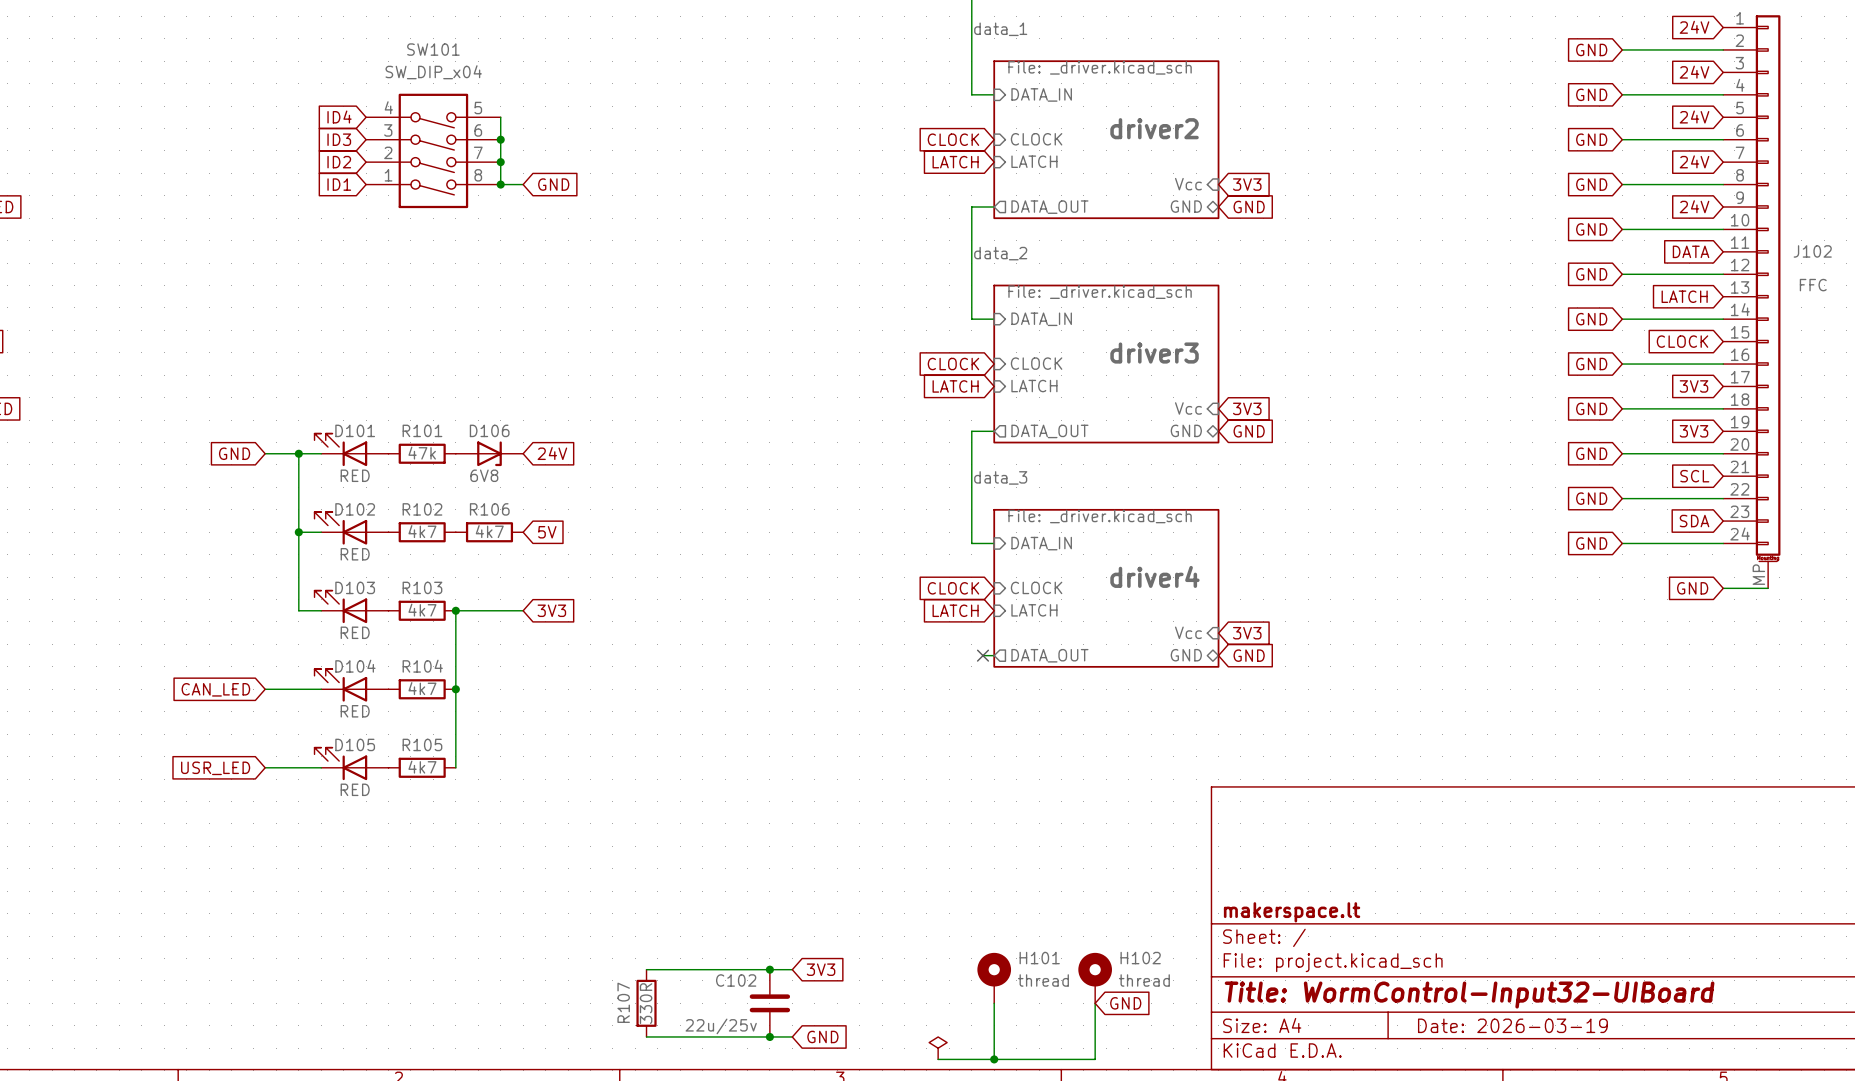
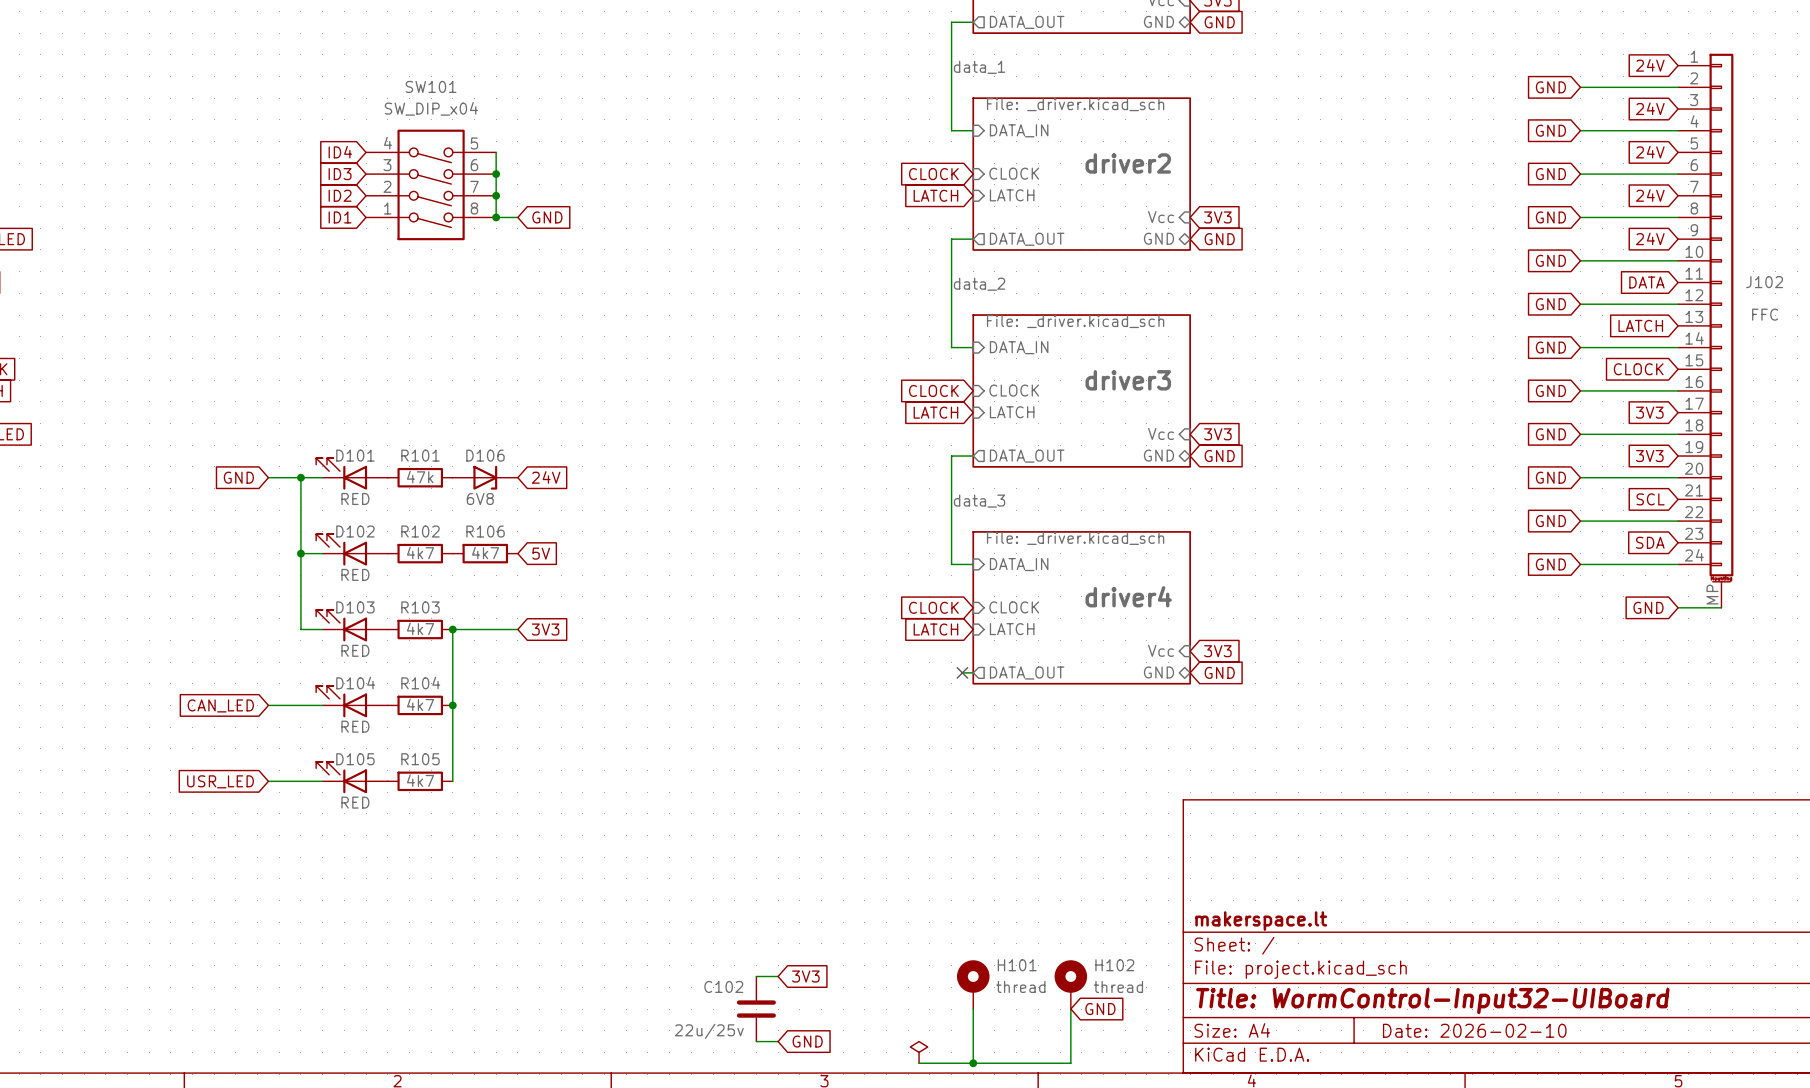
wire: (646, 969) (769, 969) -> none
junction: (769, 969) -> none
R107: 330R (646, 1003) -> none
title block: Date: 2026-03-19 (1512, 1025) -> Date: 2026-02-10 (1474, 1030)
wire: (646, 1036) (769, 1036) -> none
junction: (769, 1036) -> none

